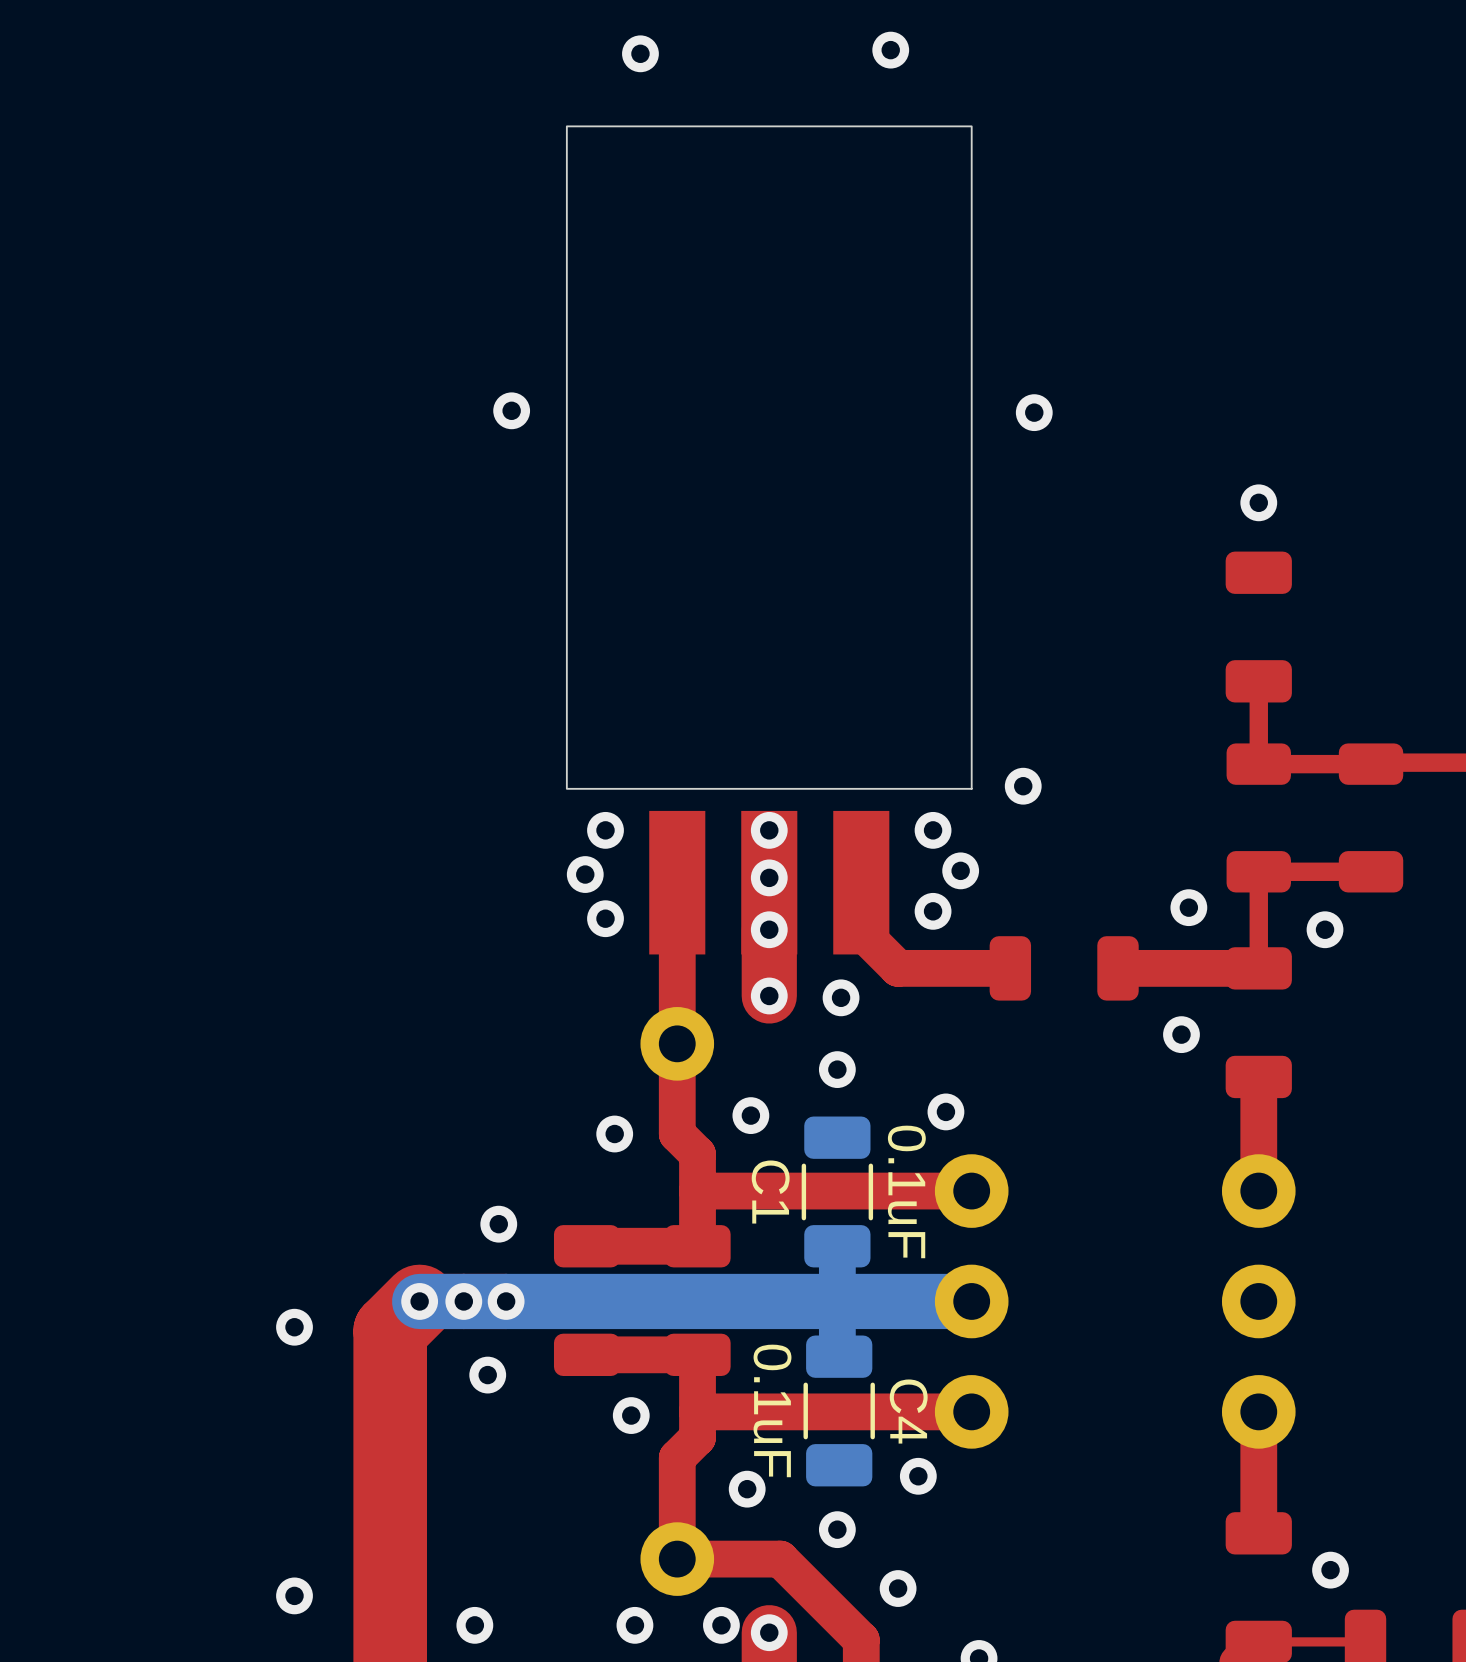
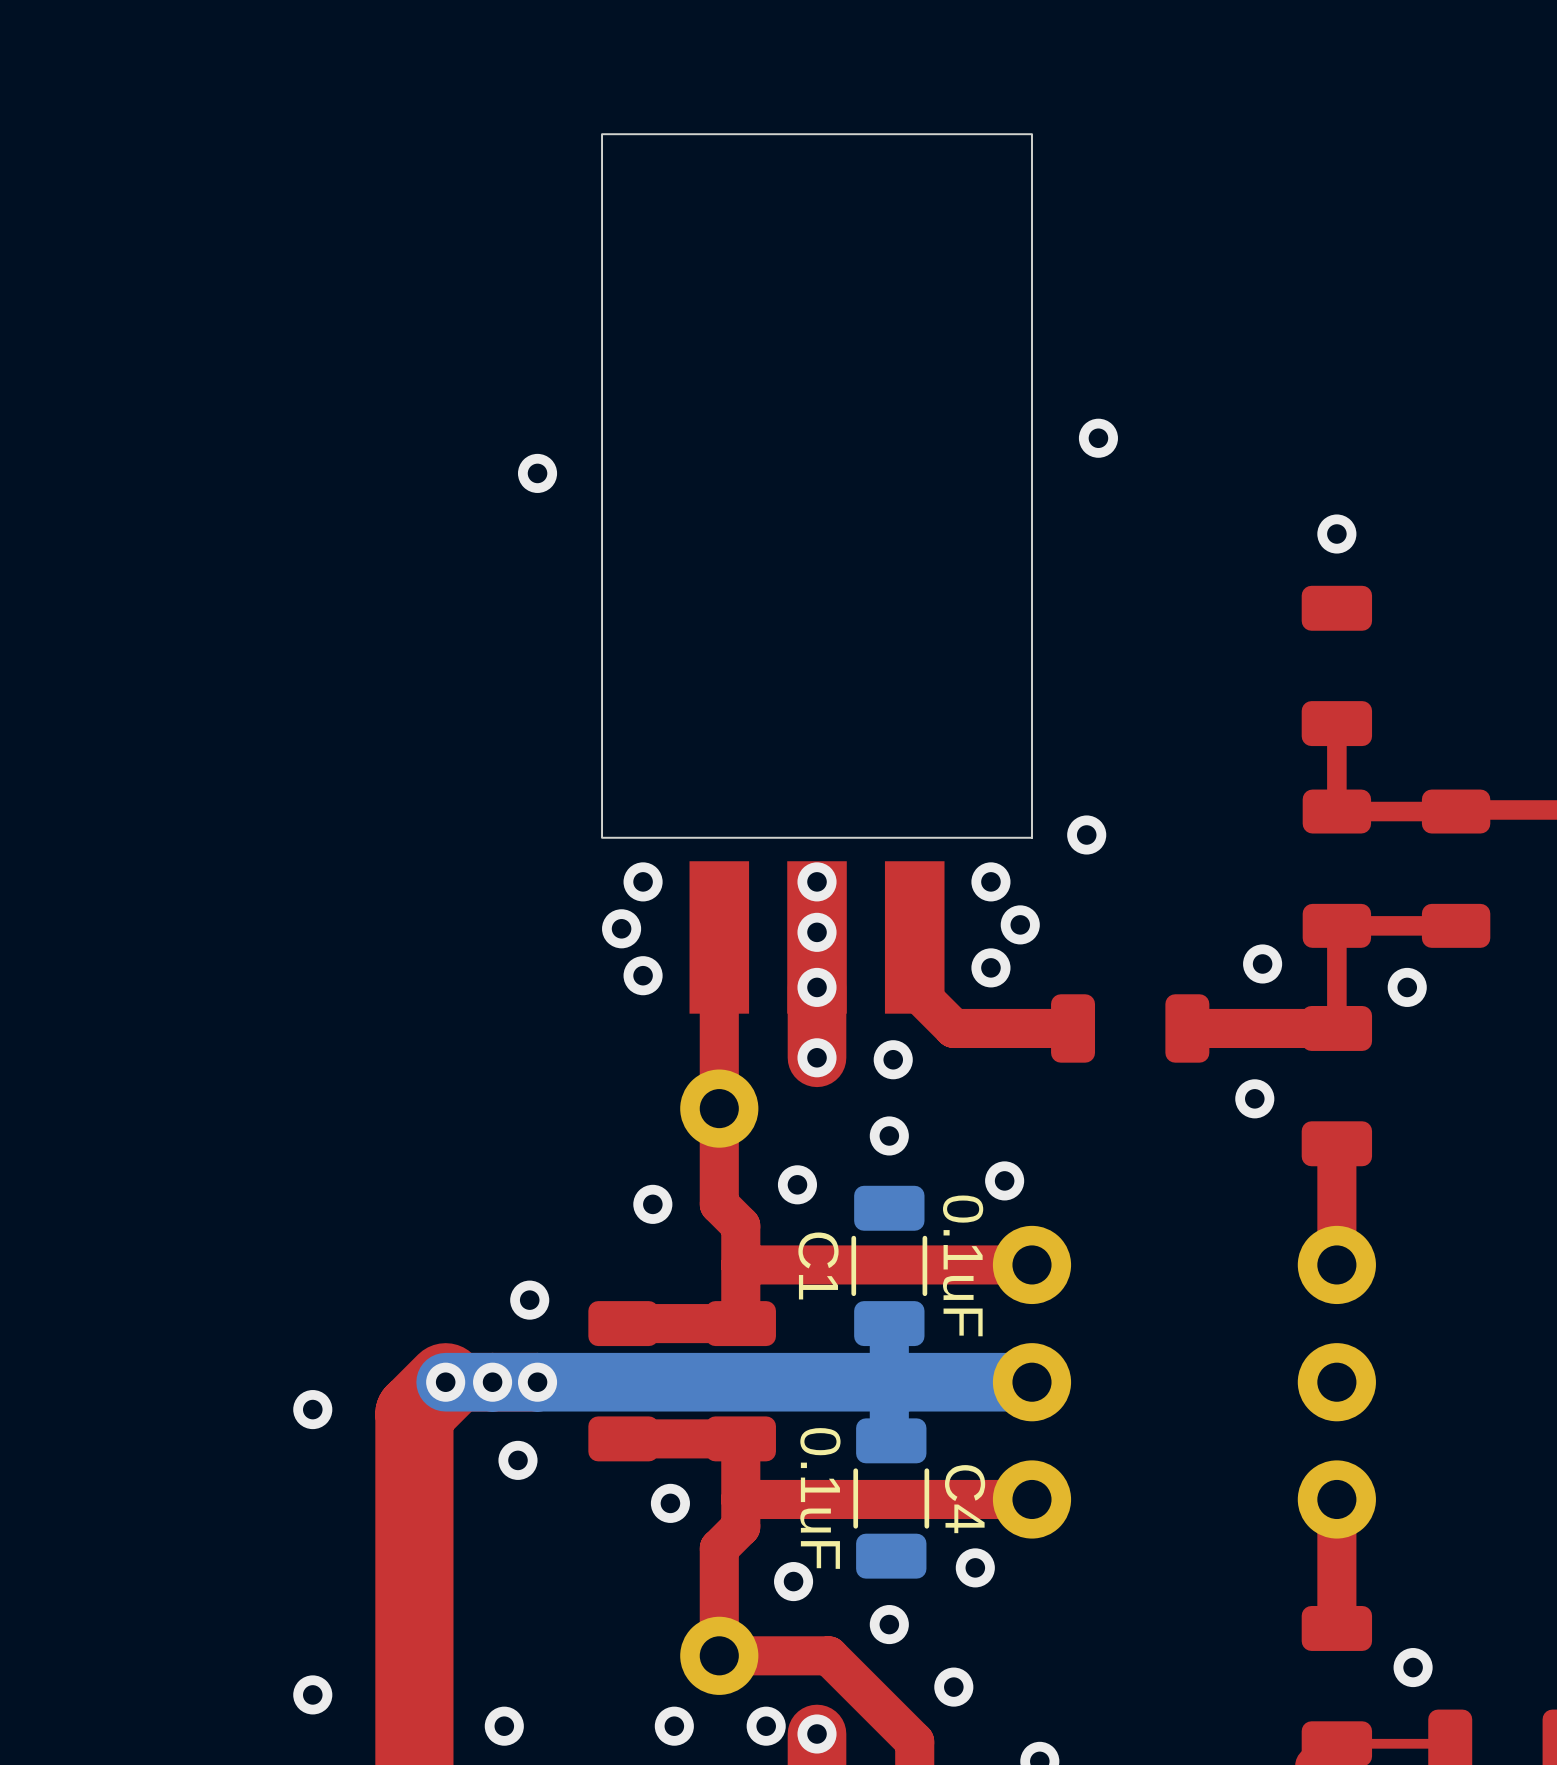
via: (890, 50) -> none
via: (640, 53) -> none
via position: (511, 410) -> (537, 473)

